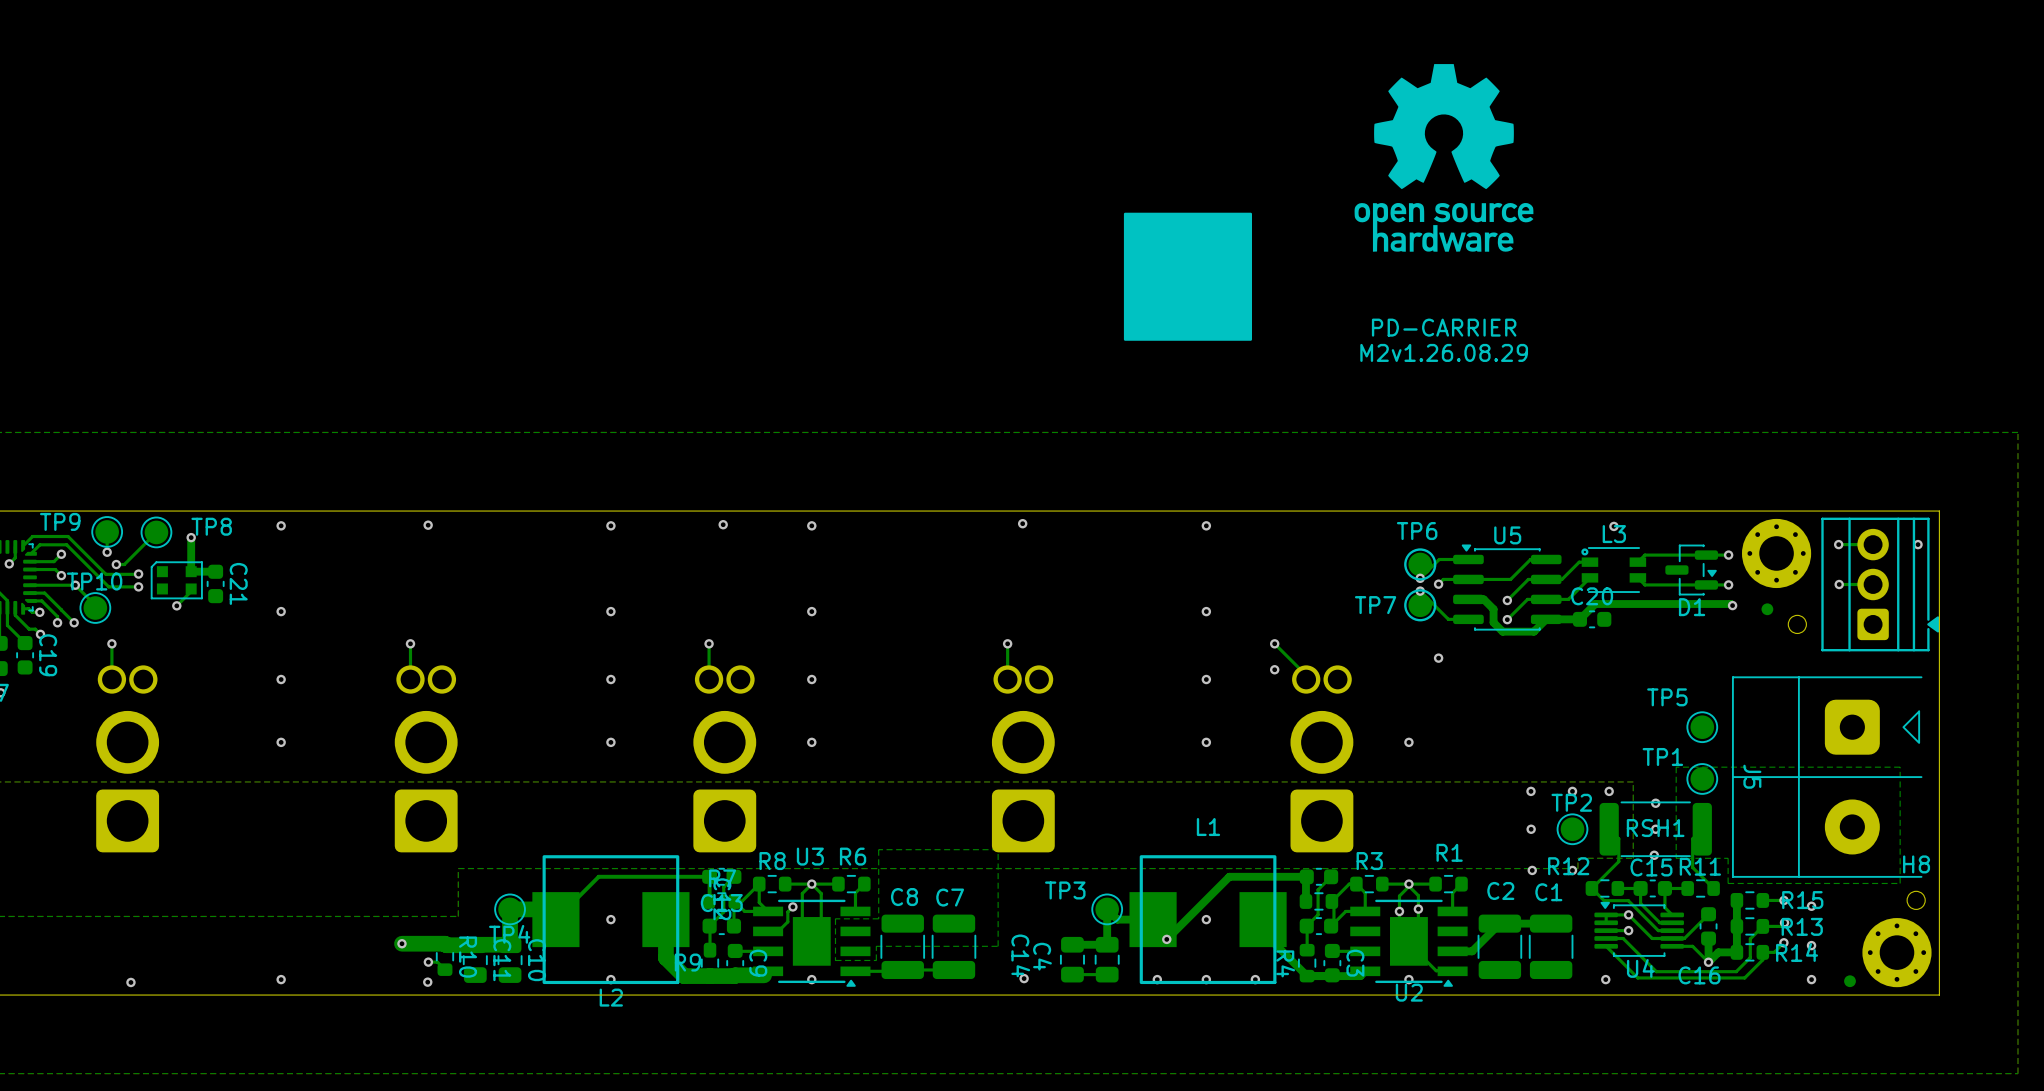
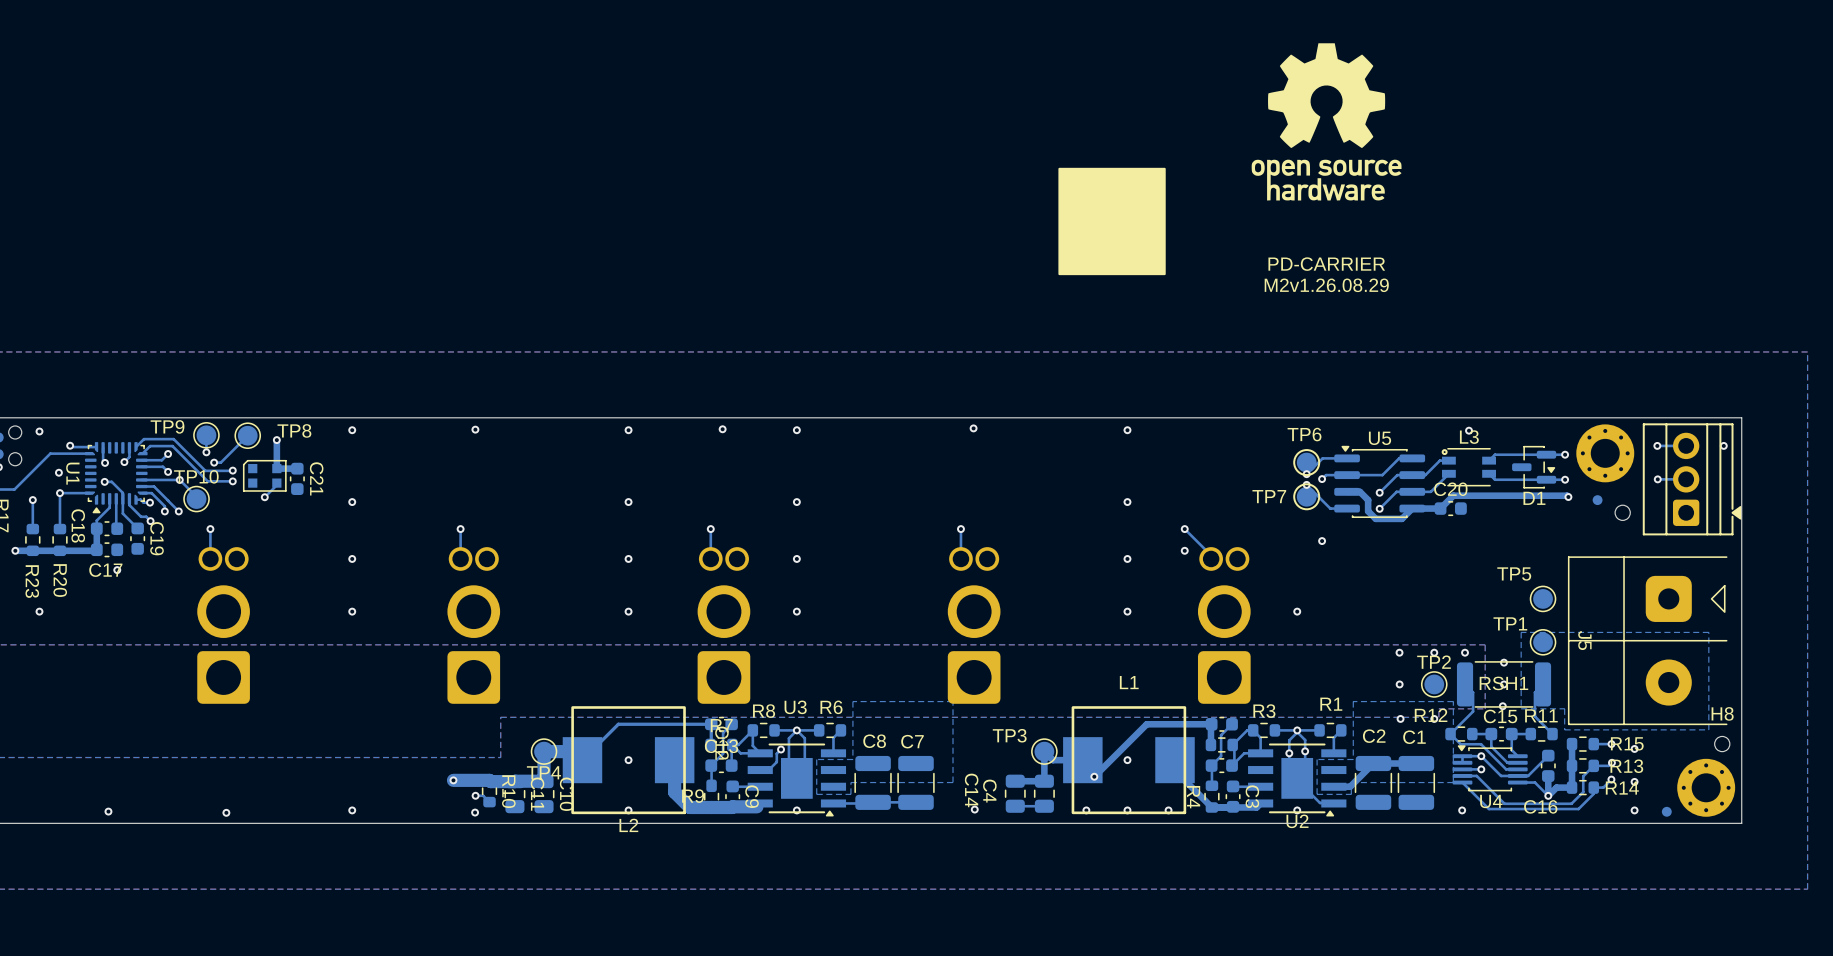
bottom zone outline: none -> (1453, 701) (1353, 701) (1353, 759) (1317, 759) (1317, 794) (1351, 794) (1351, 782) (1453, 782) (1453, 701)

